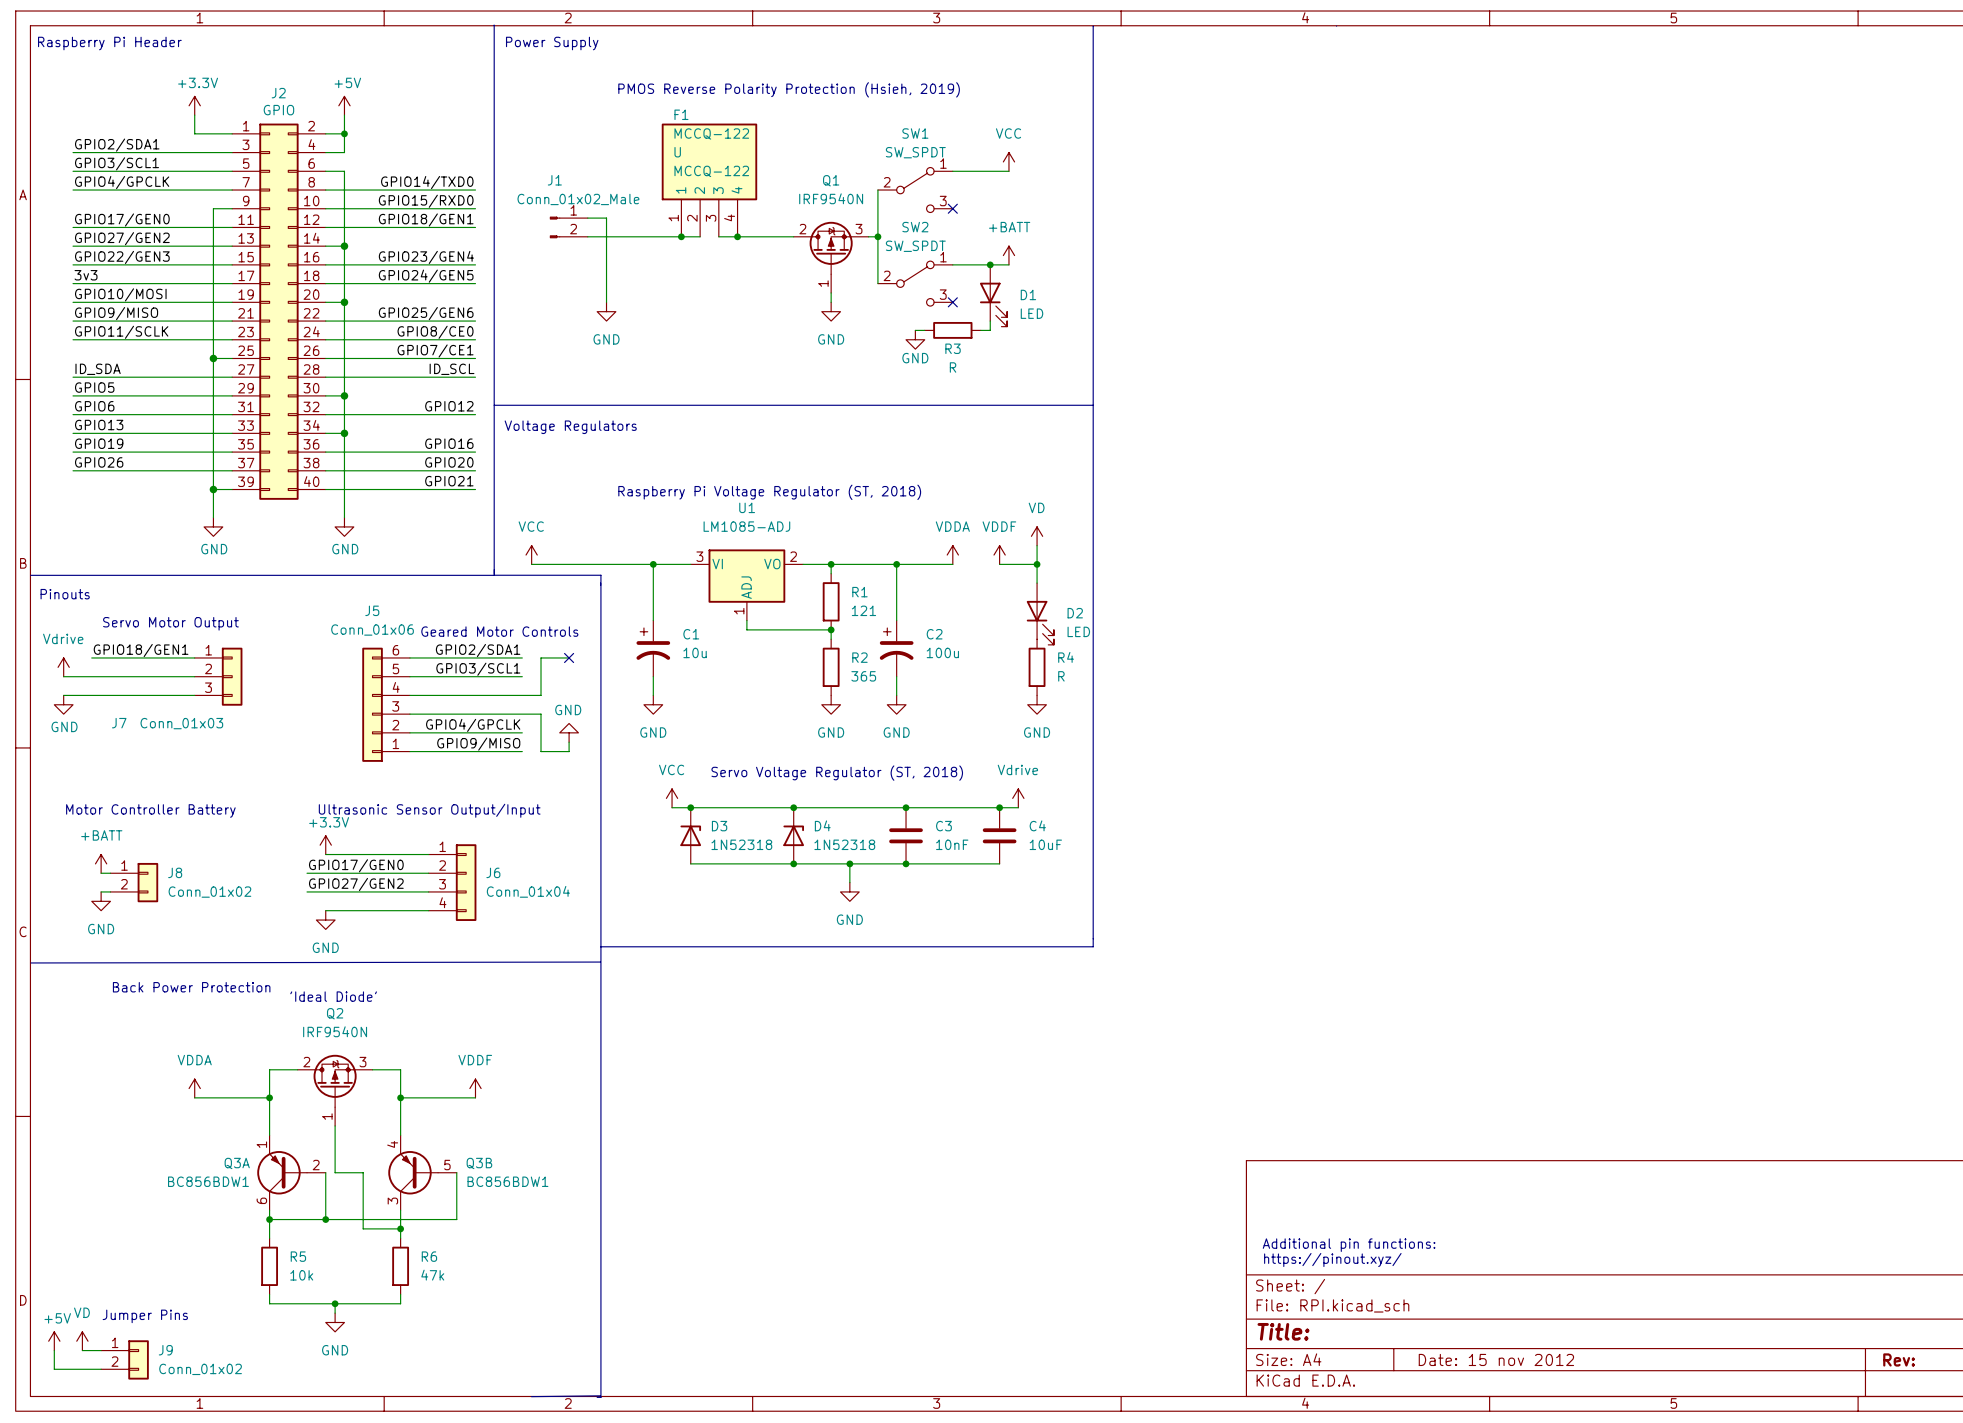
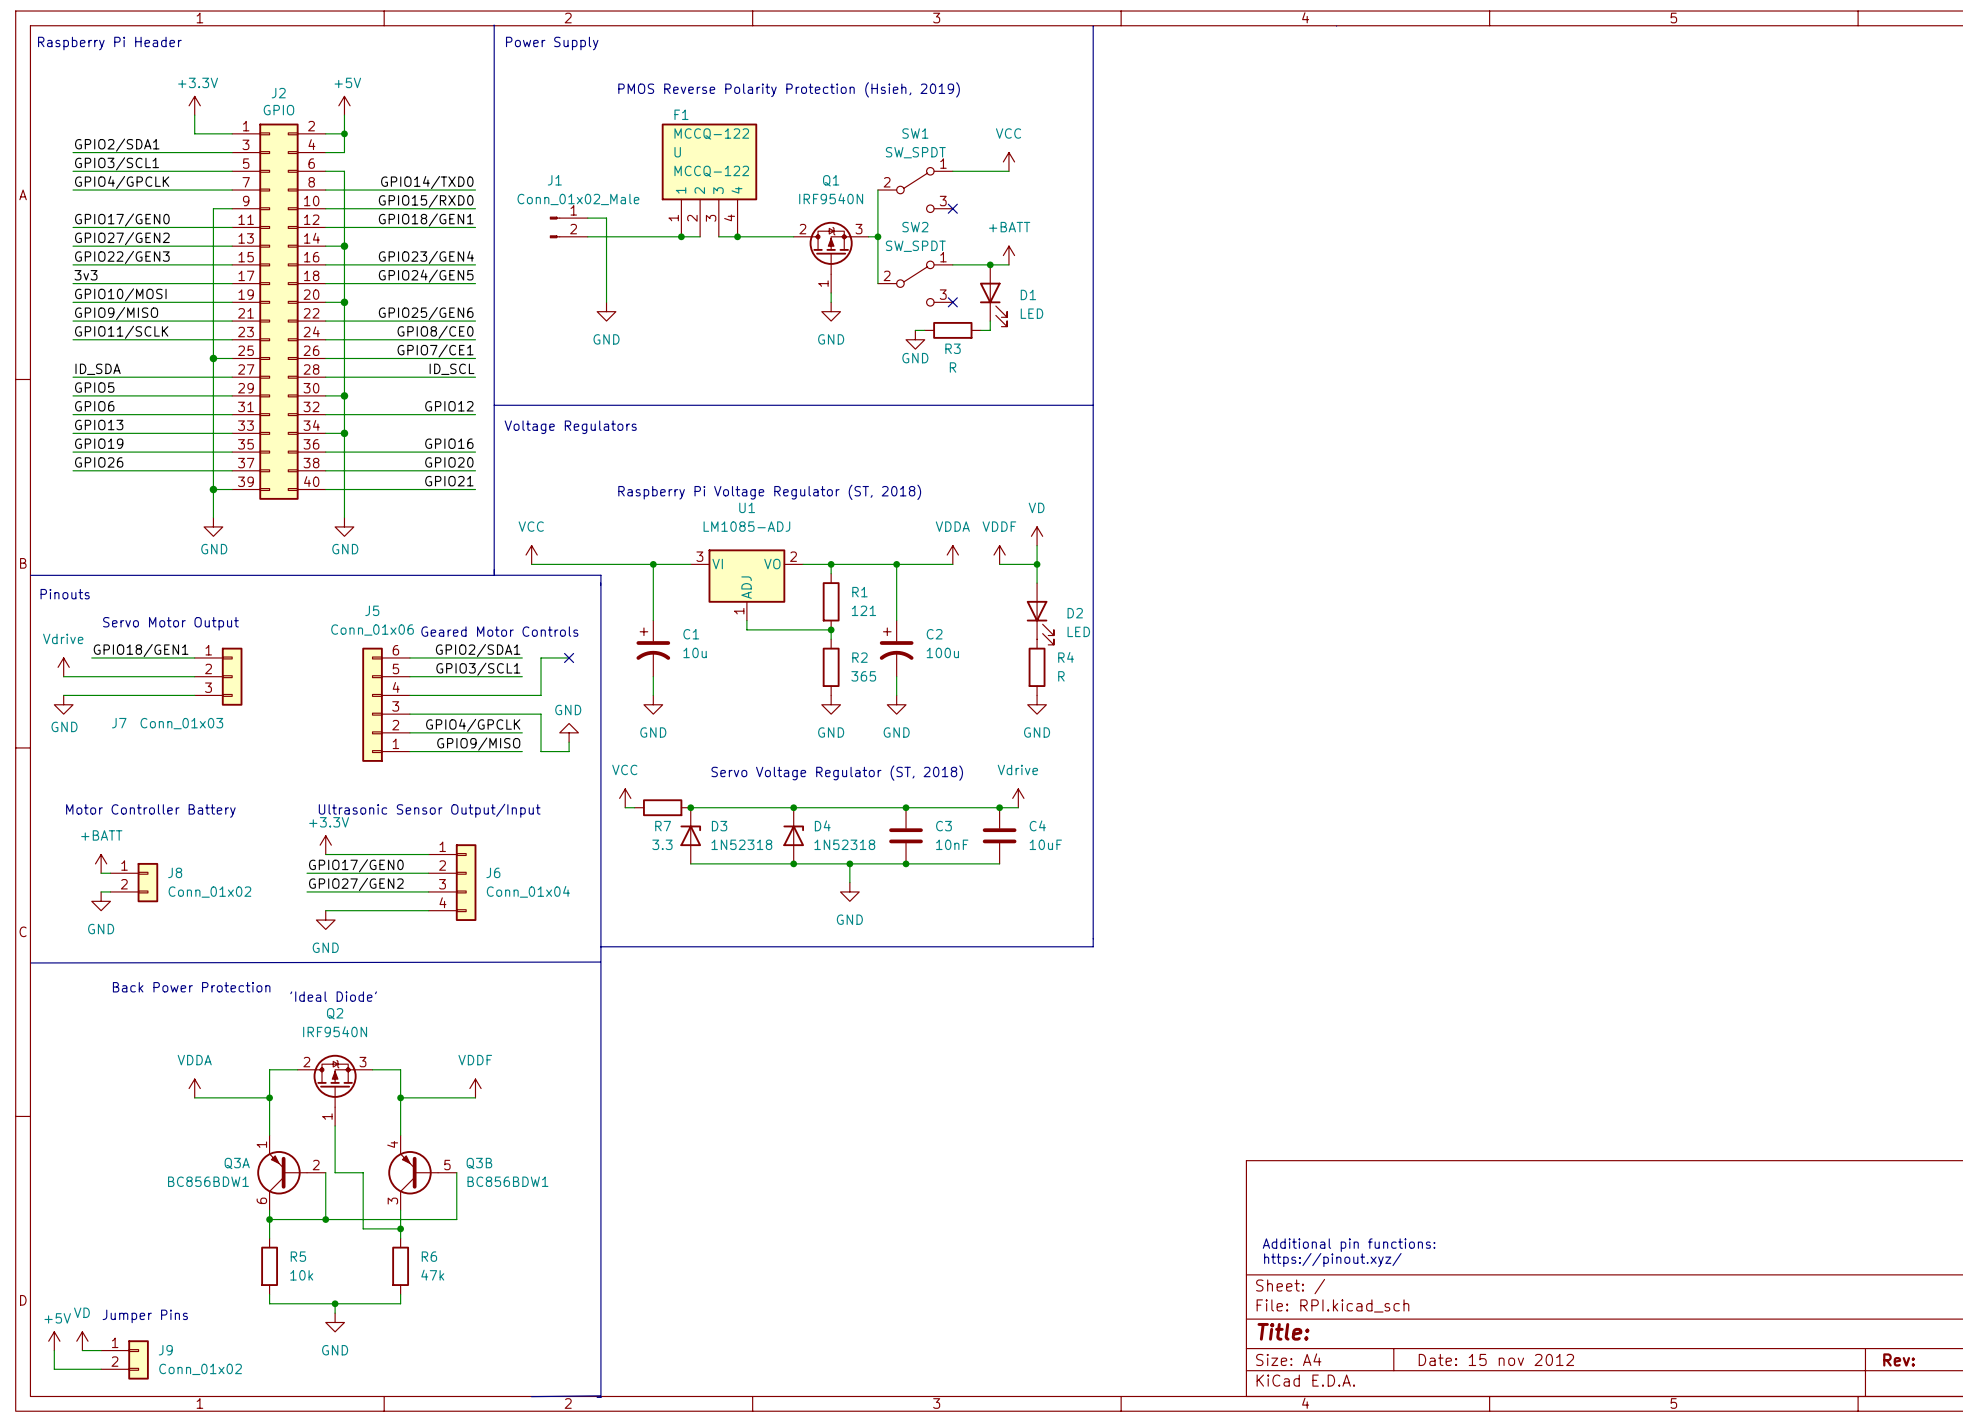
power symbol position: VCC (672, 798) -> VCC (625, 798)
wire: none -> (625, 807) (634, 807)
R7: none -> 3.3 (662, 807)

